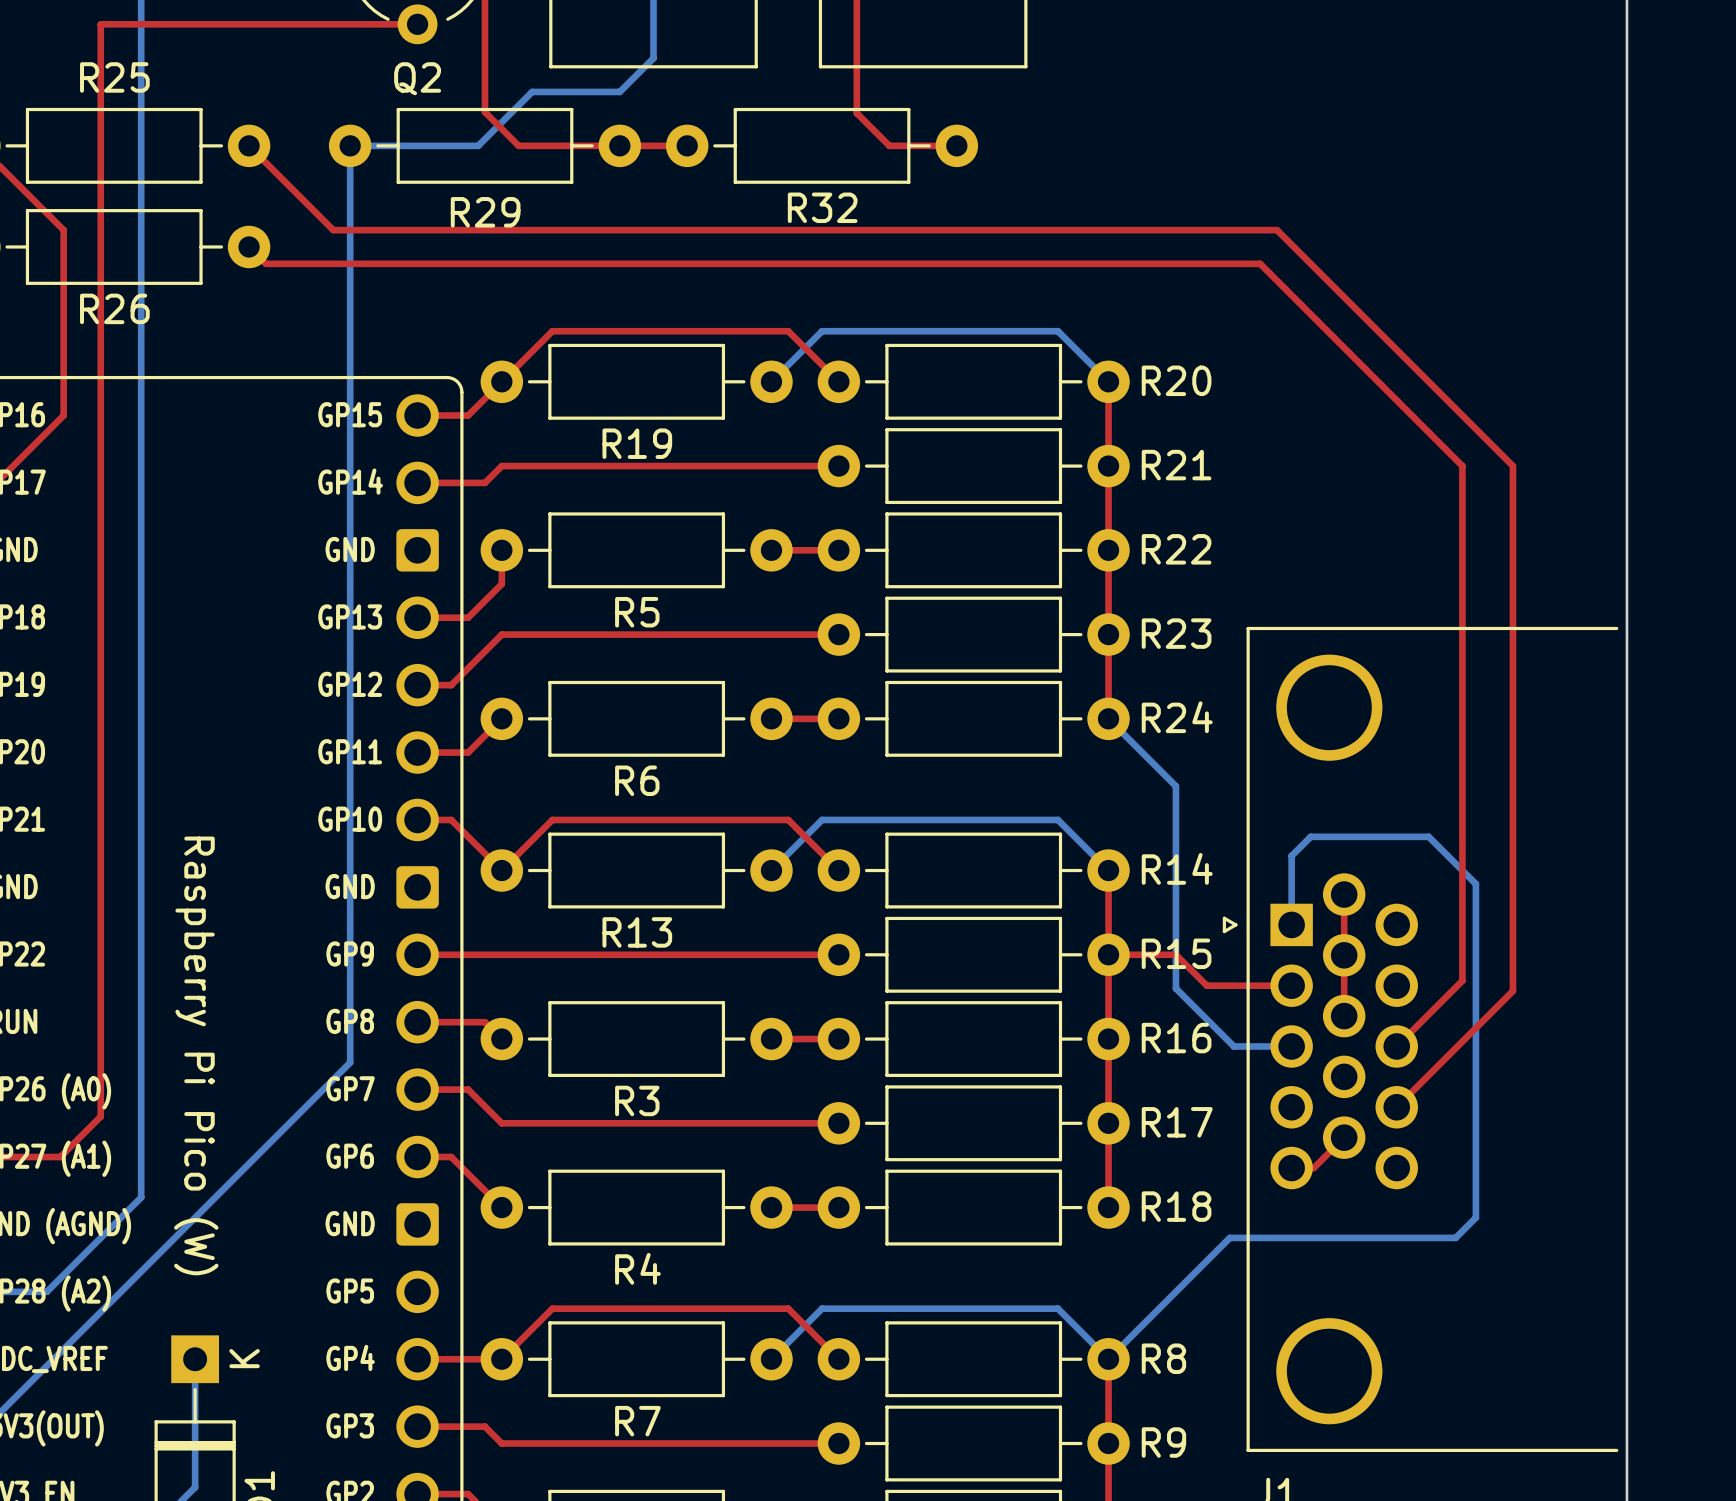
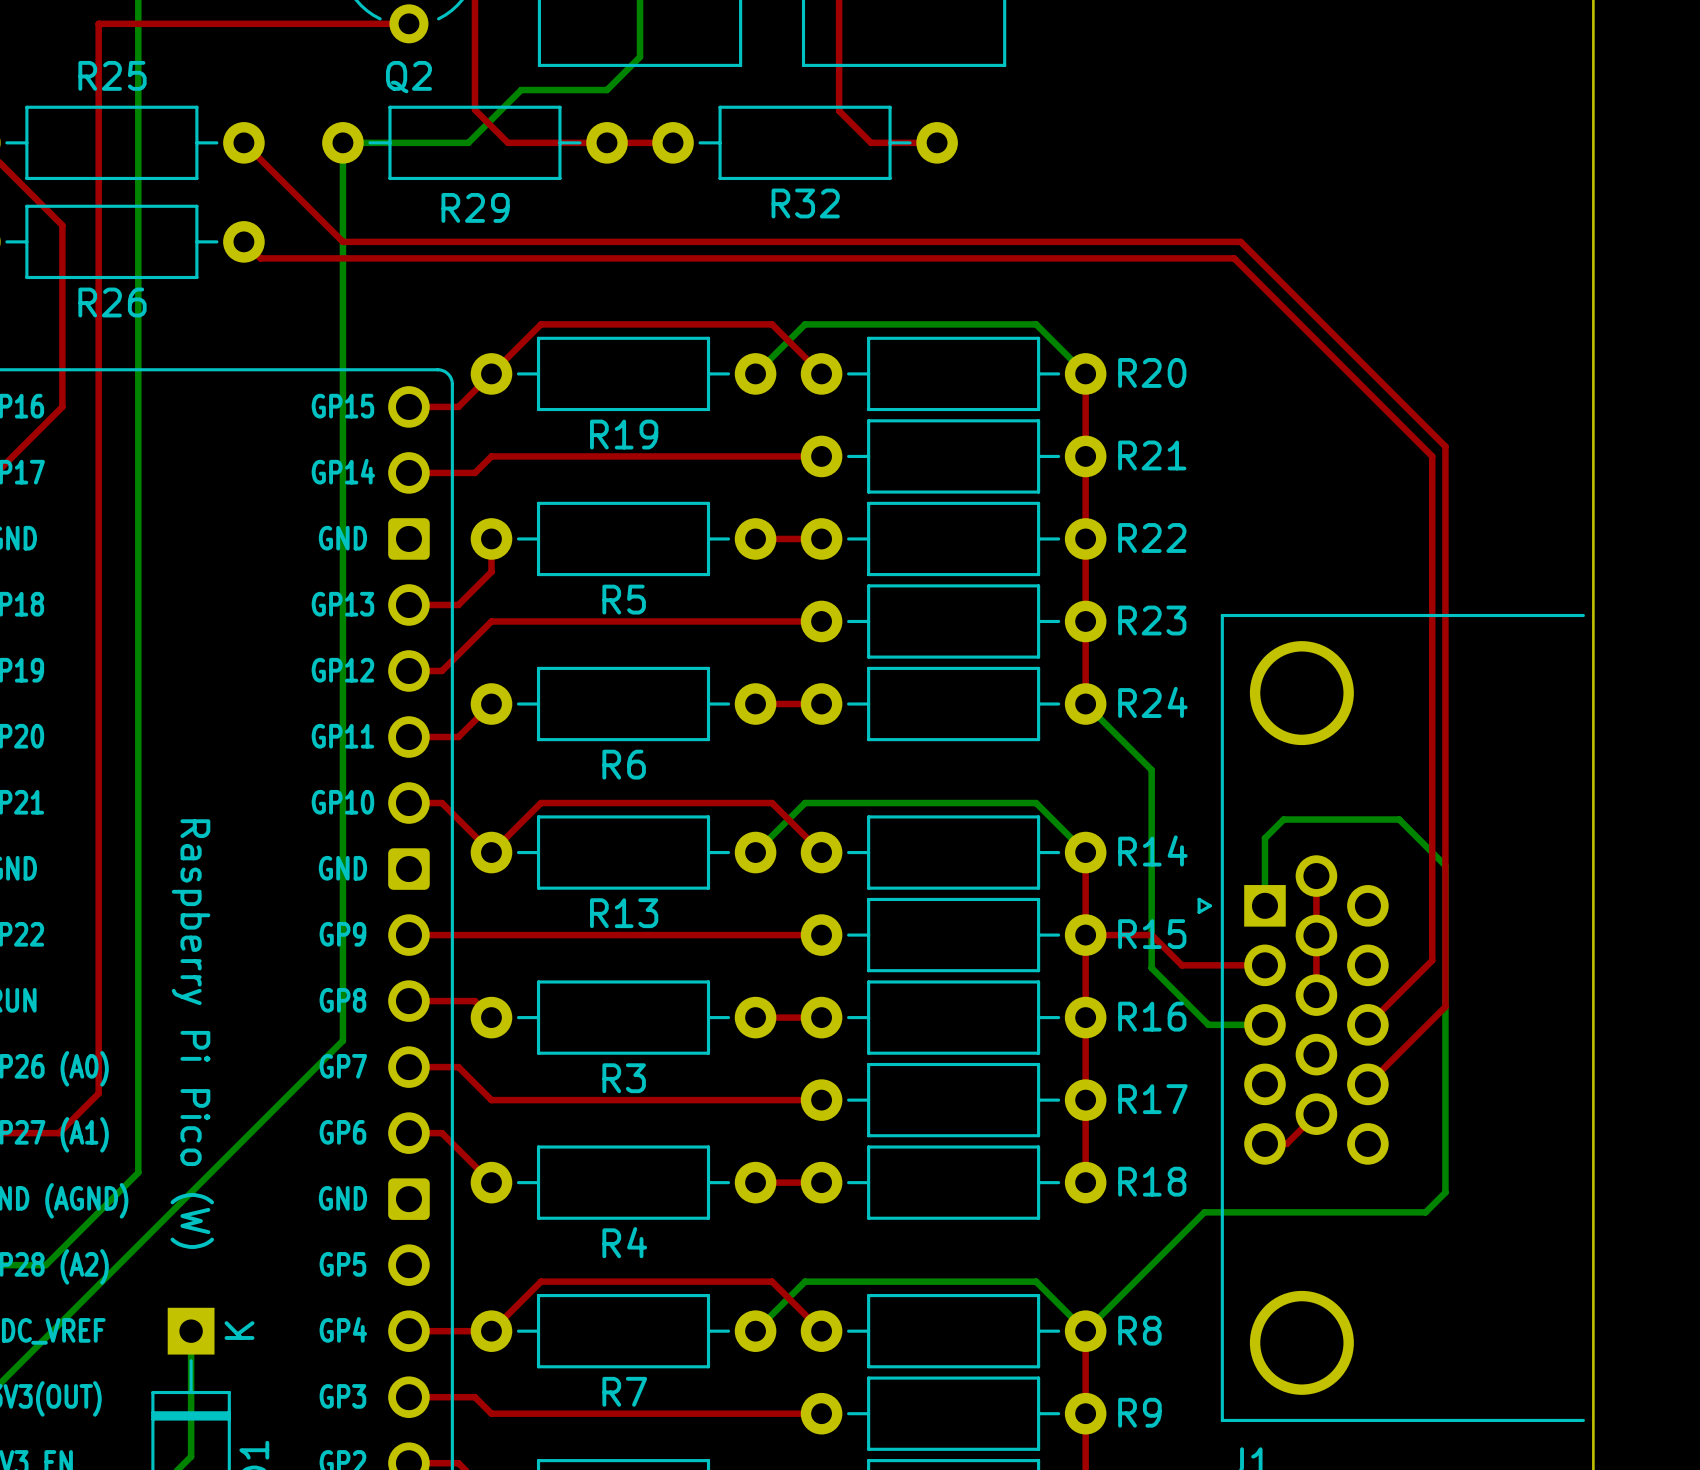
top track: (333, 230) (1277, 230) (1512, 466) (1512, 991) (1475, 1028) -> (326, 225) (342, 241) (1240, 241) (1445, 446) (1445, 1006)

